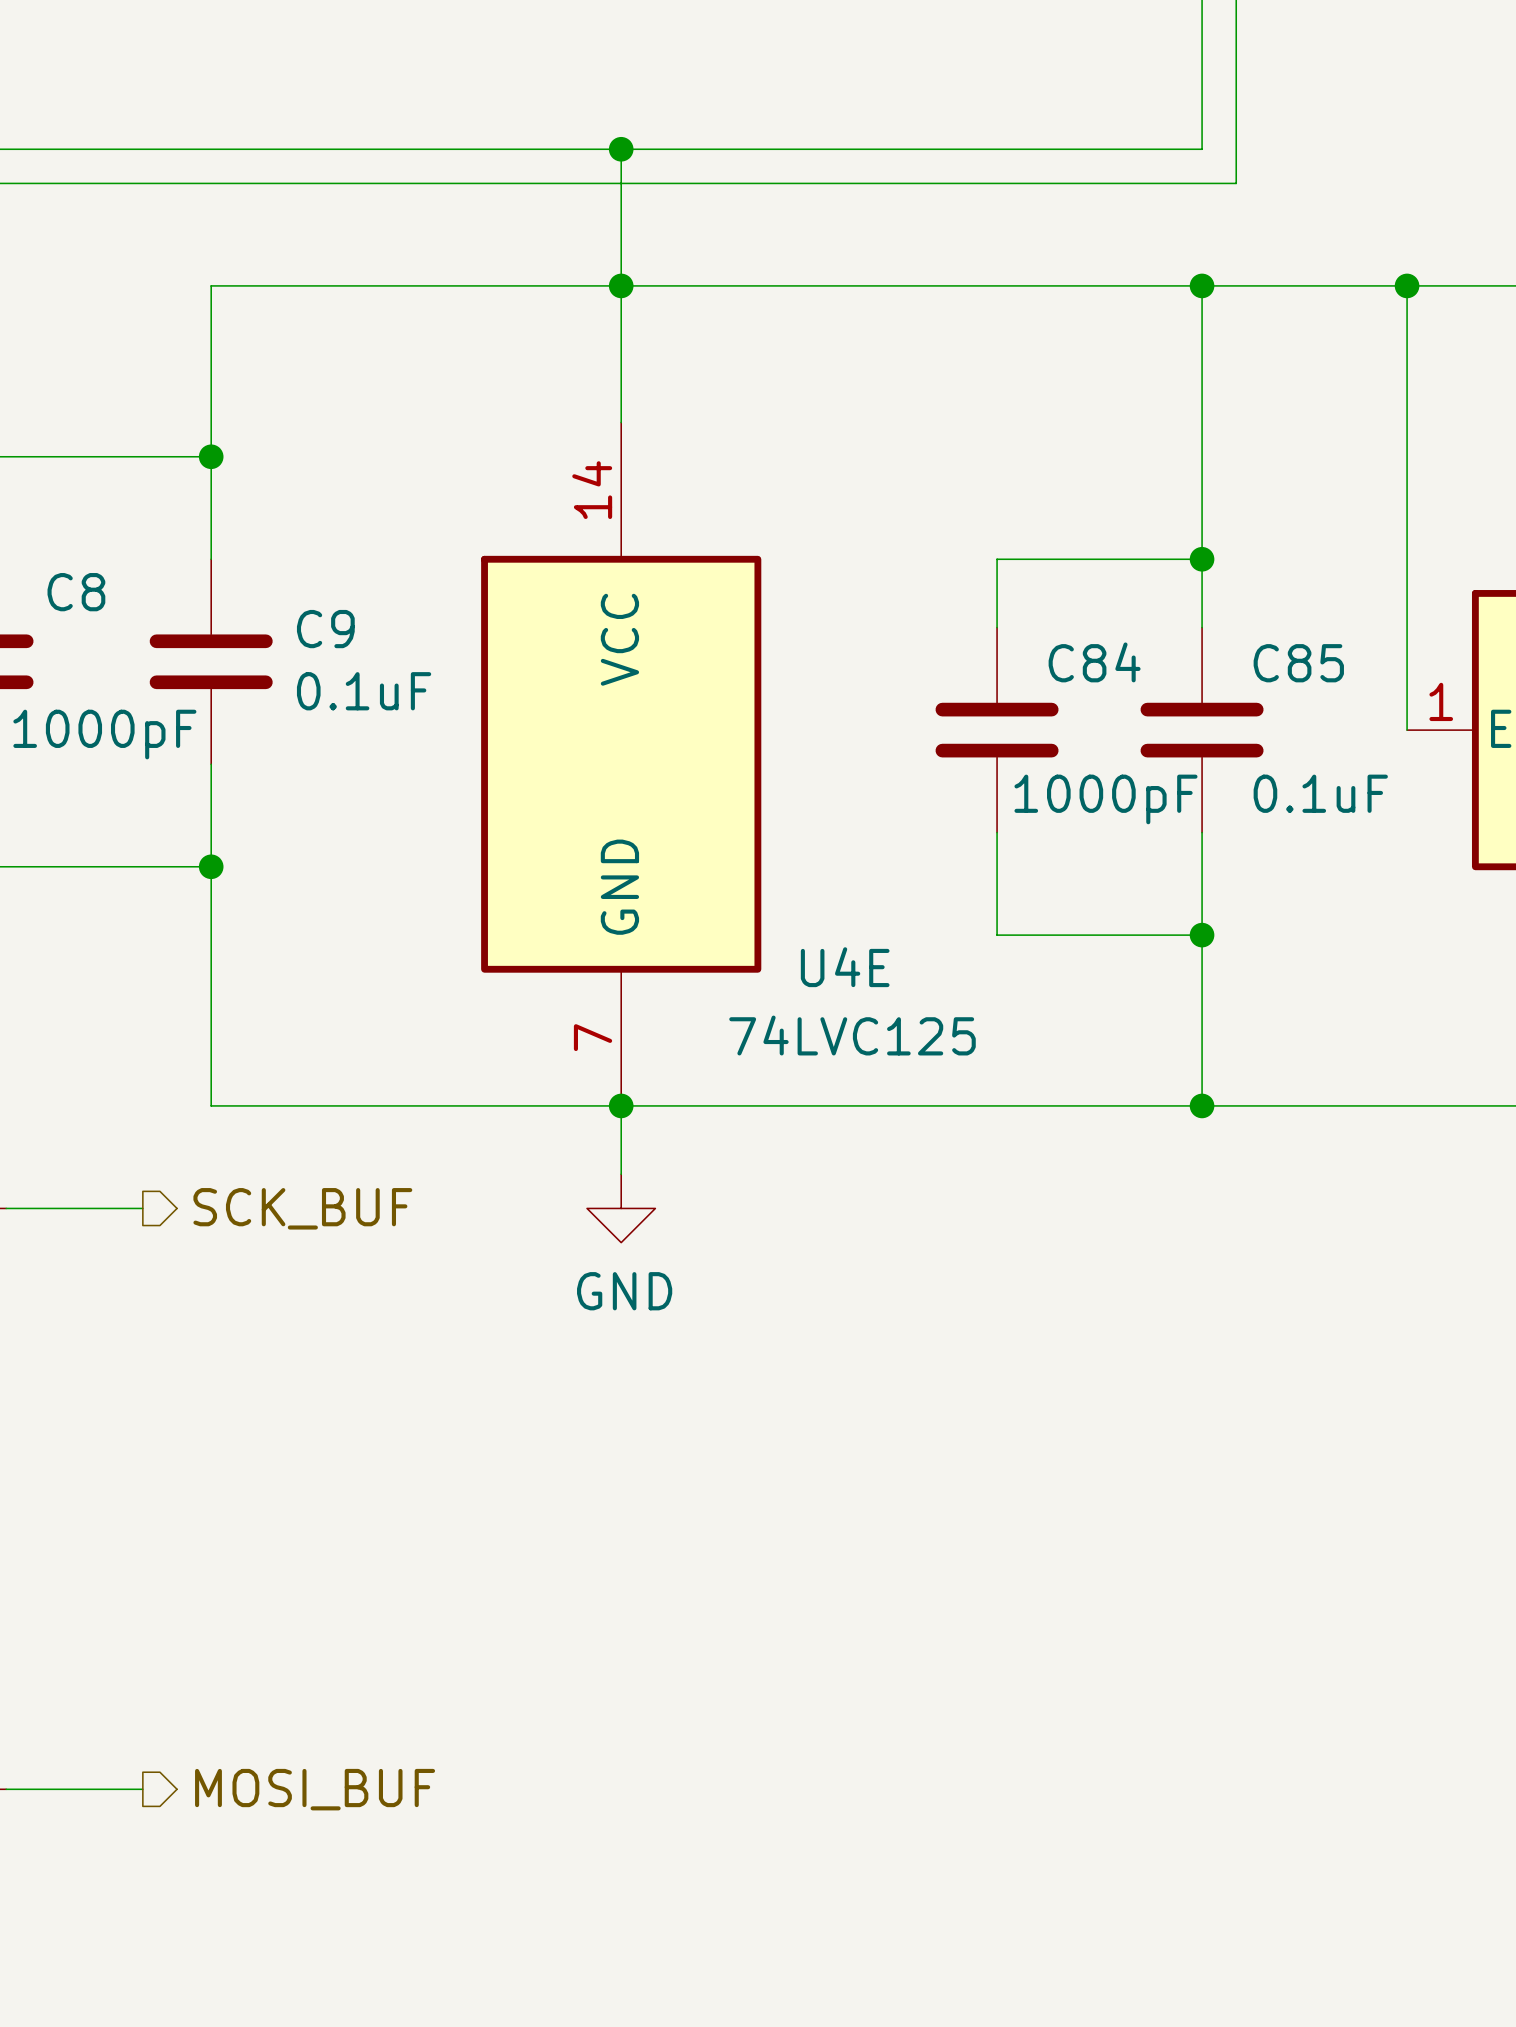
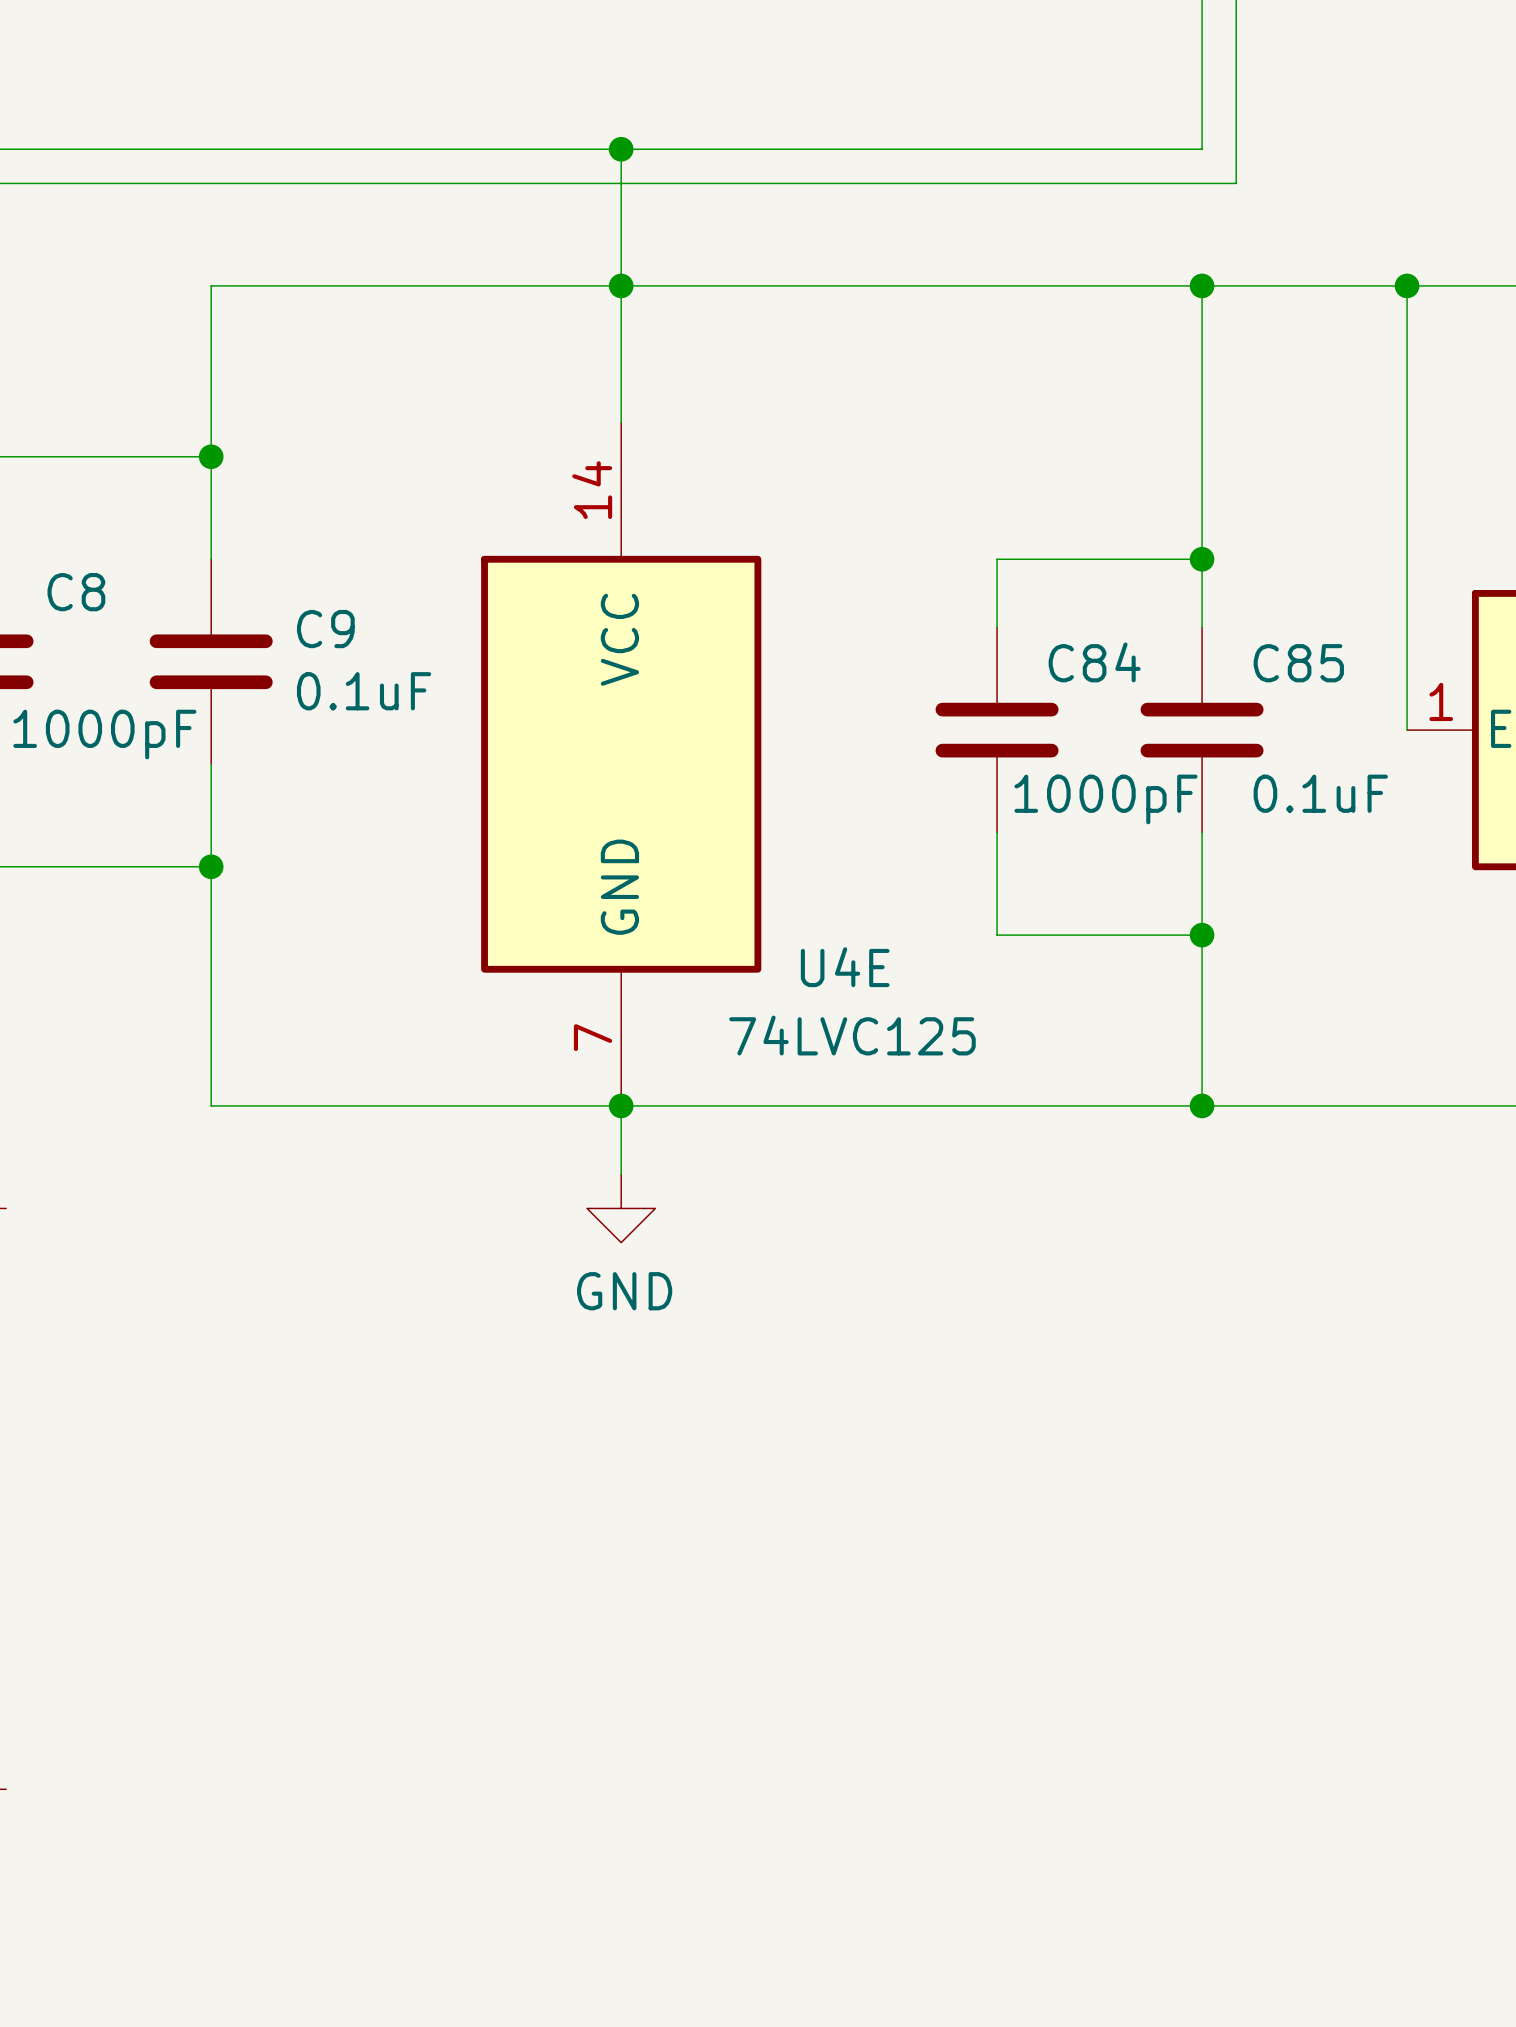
wire: (6, 1208) (142, 1208) -> none
hierarchical label: SCK_BUF (302, 1208) -> none
wire: (6, 1789) (142, 1789) -> none
hierarchical label: MOSI_BUF (315, 1789) -> none

